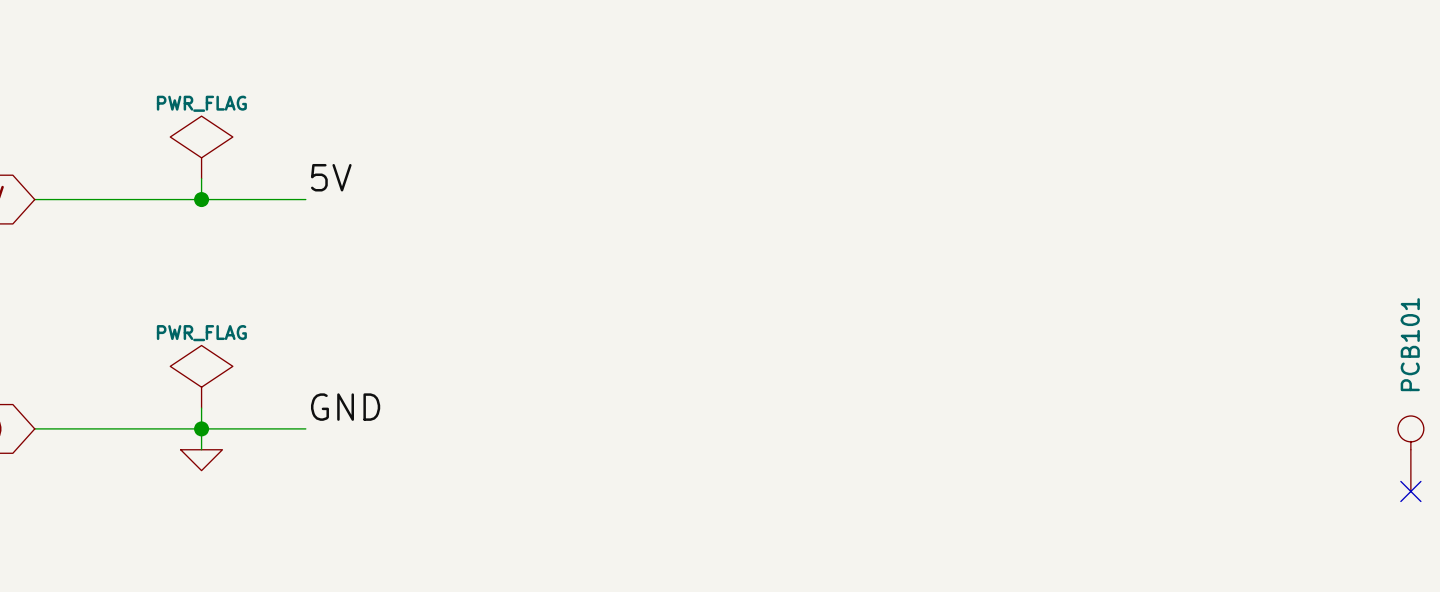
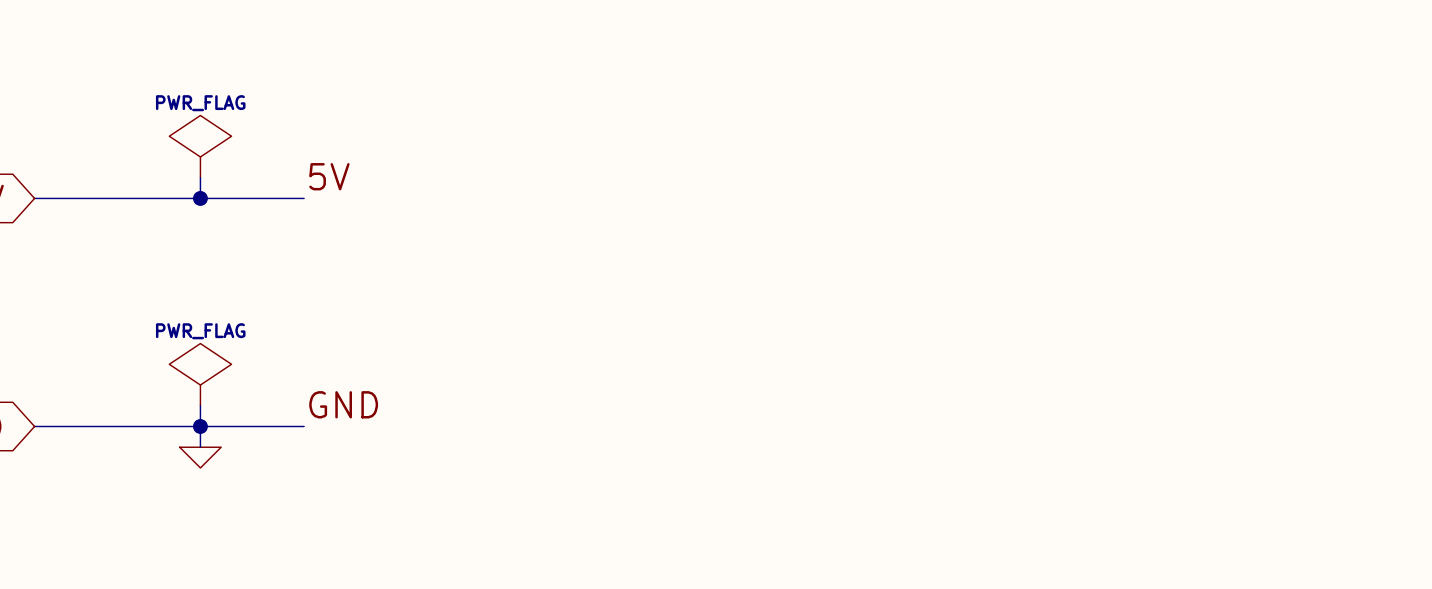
PCB101: (1410, 453) -> none
no-connect mark: (1410, 491) -> none

